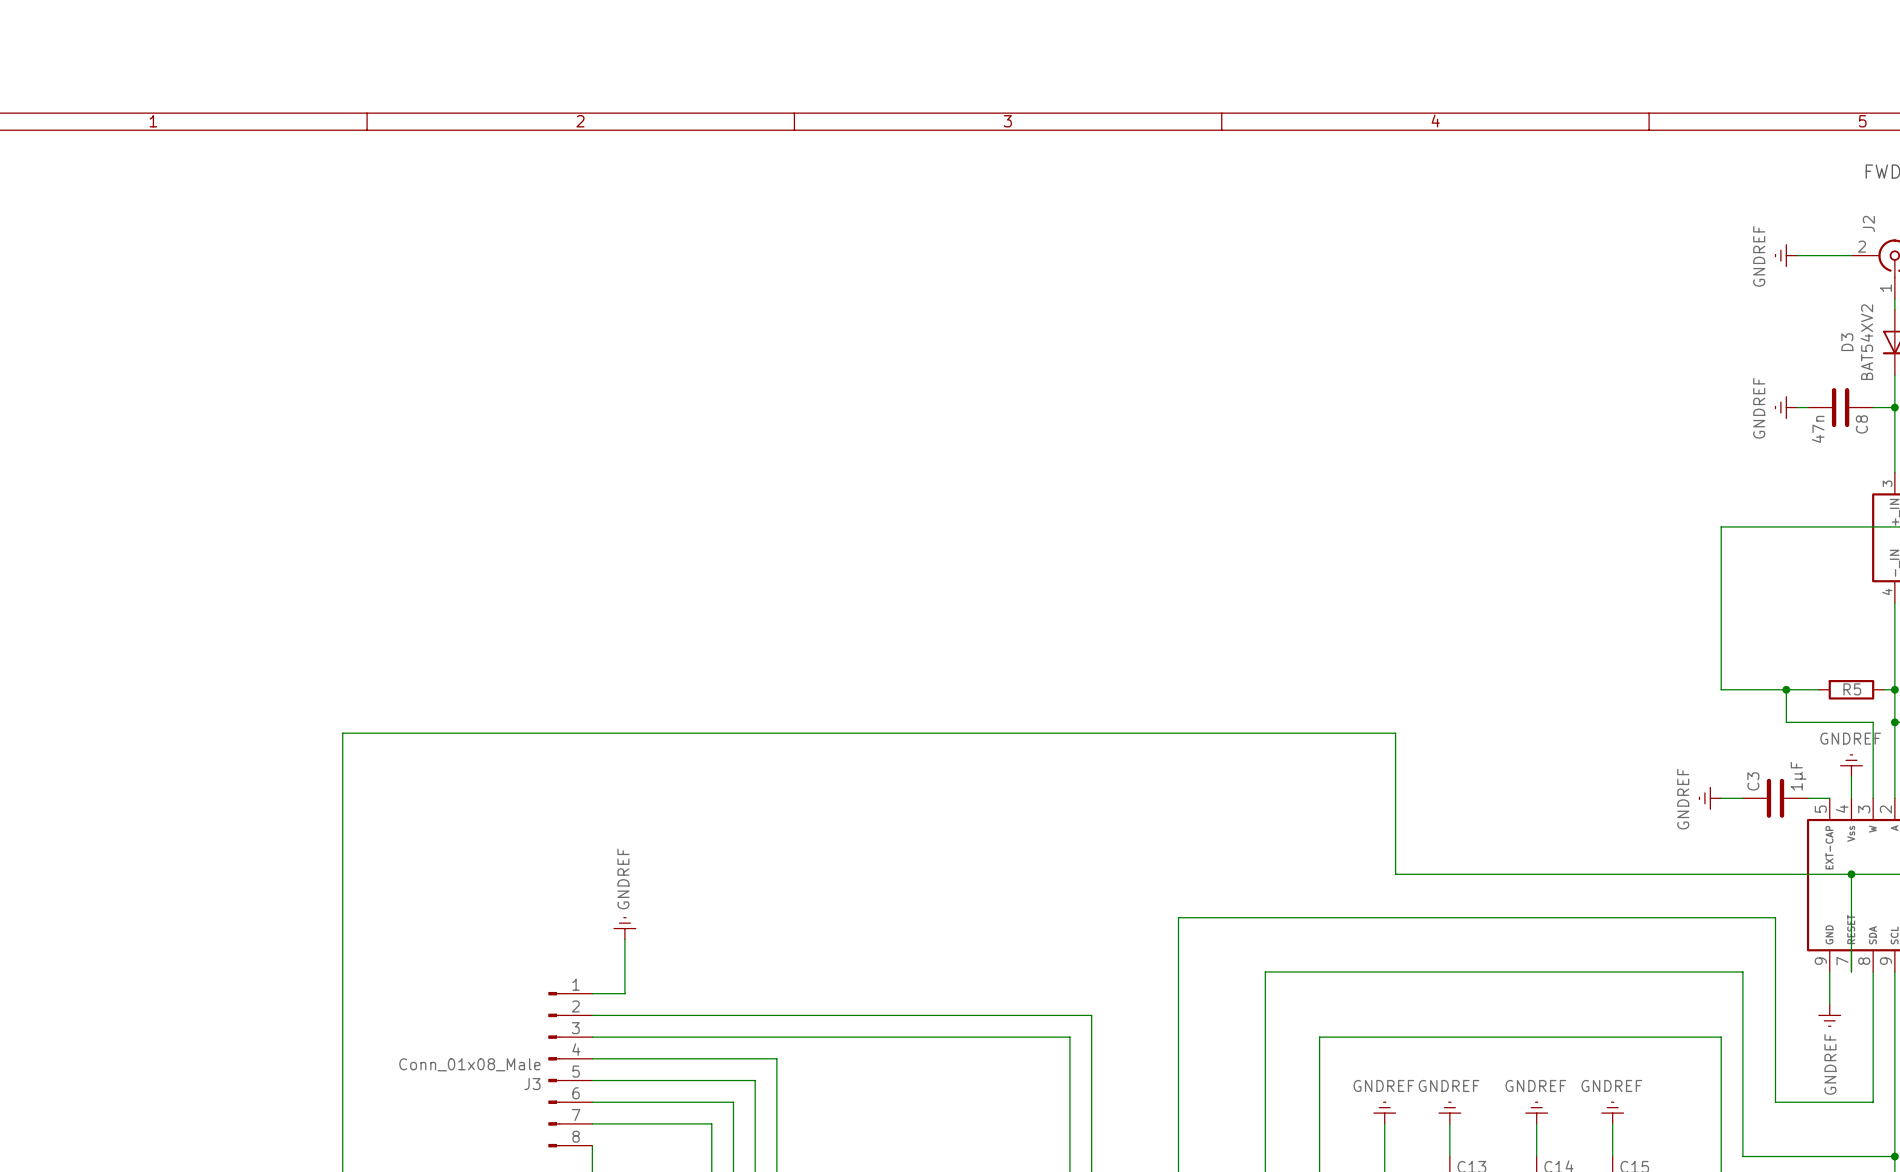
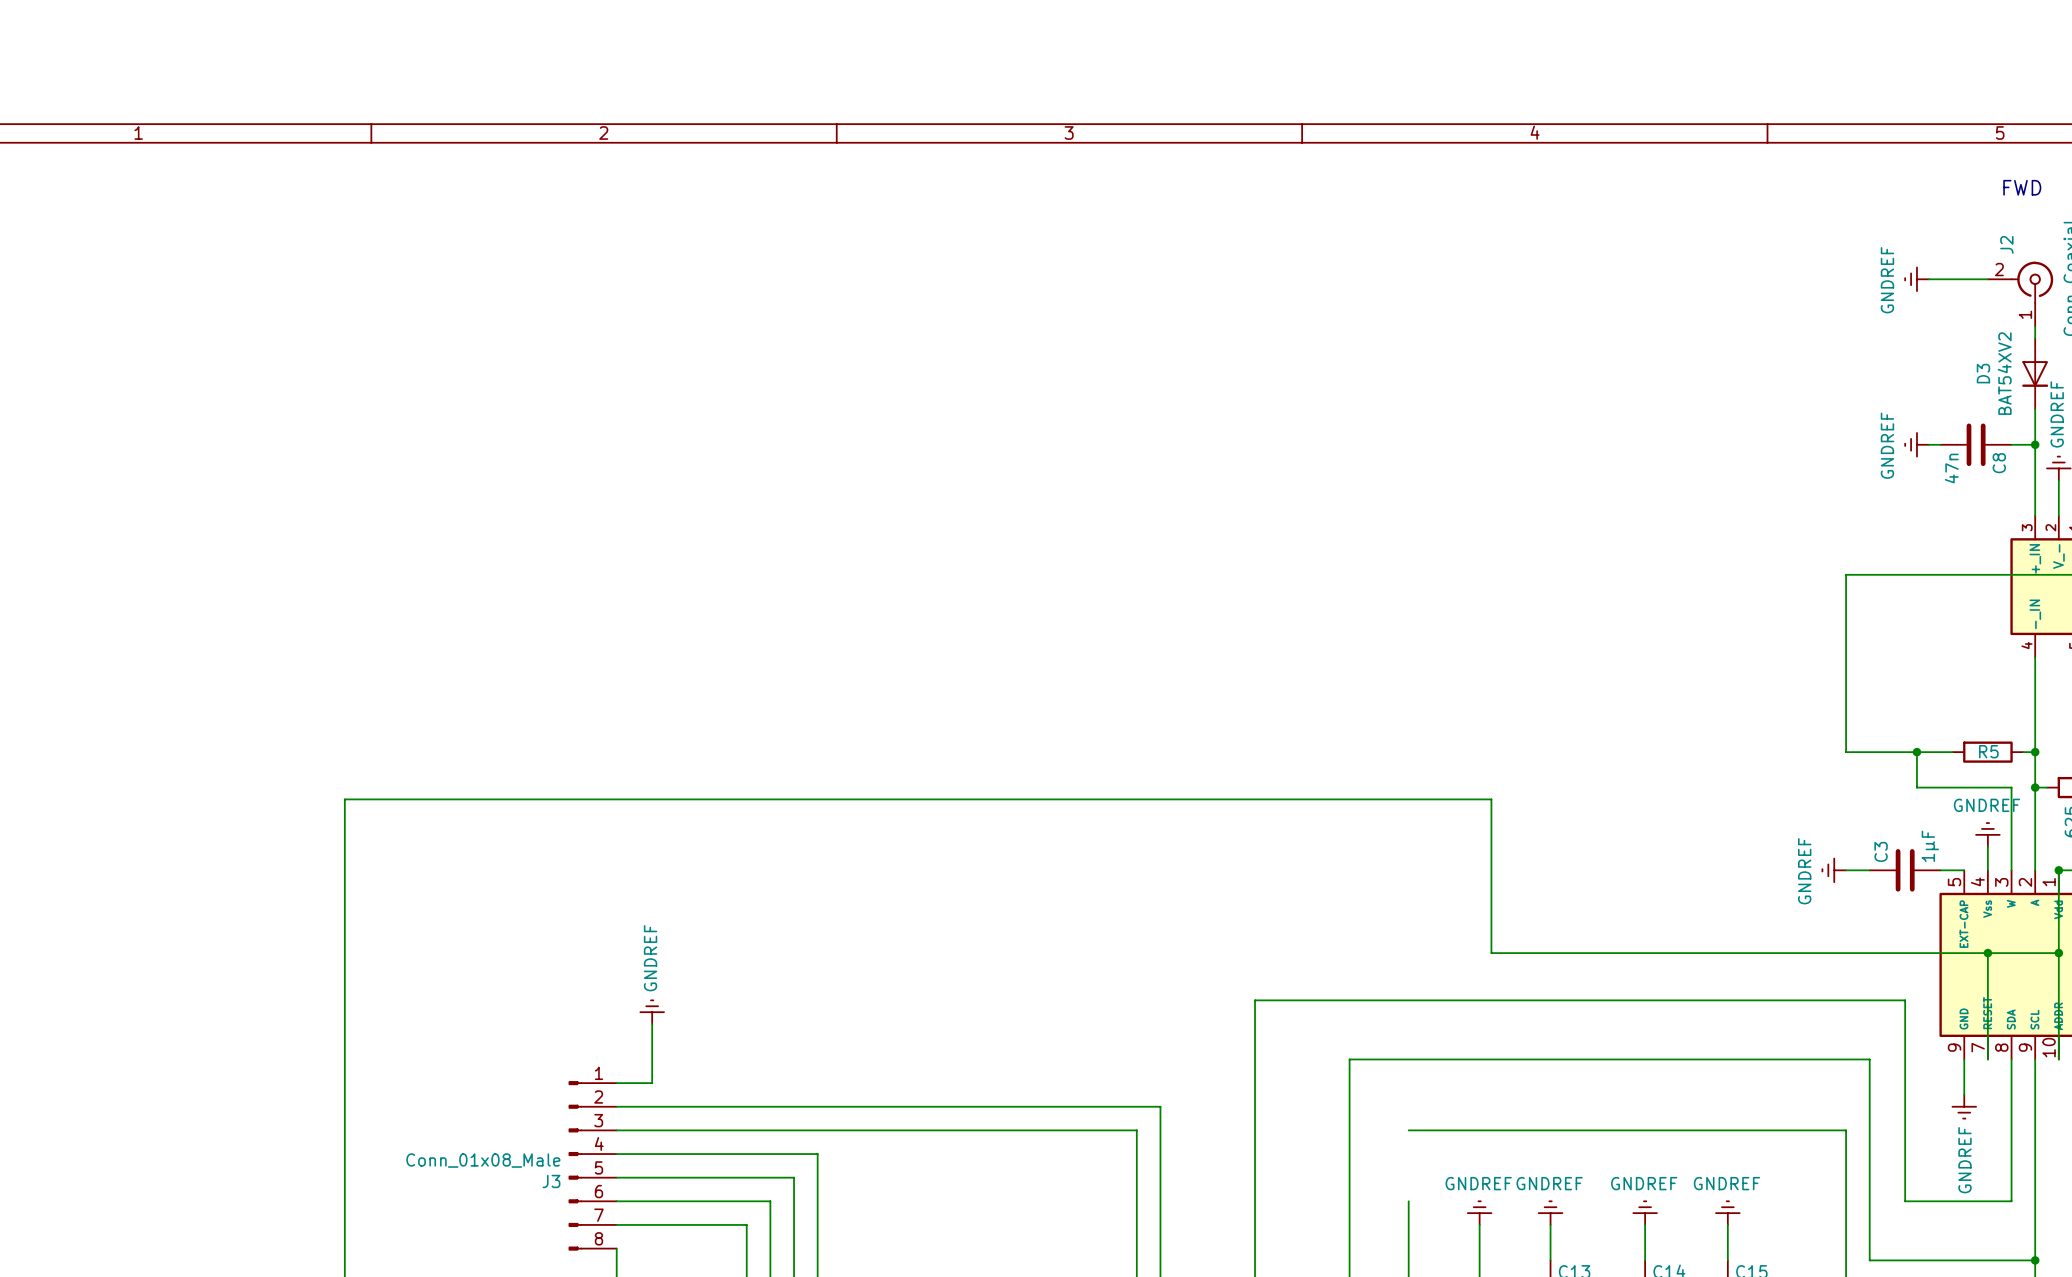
wire: (1319, 1037) (1319, 1102) -> none

